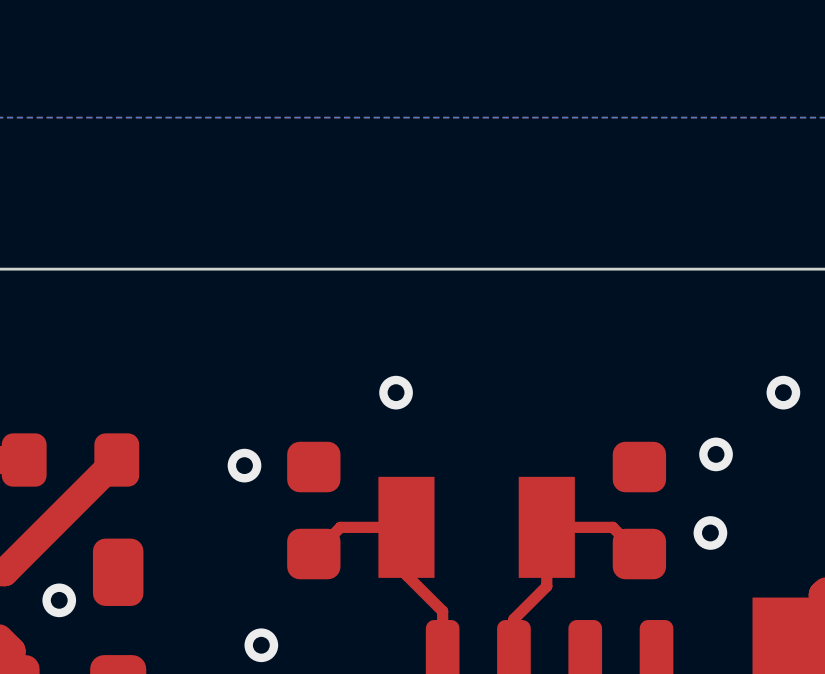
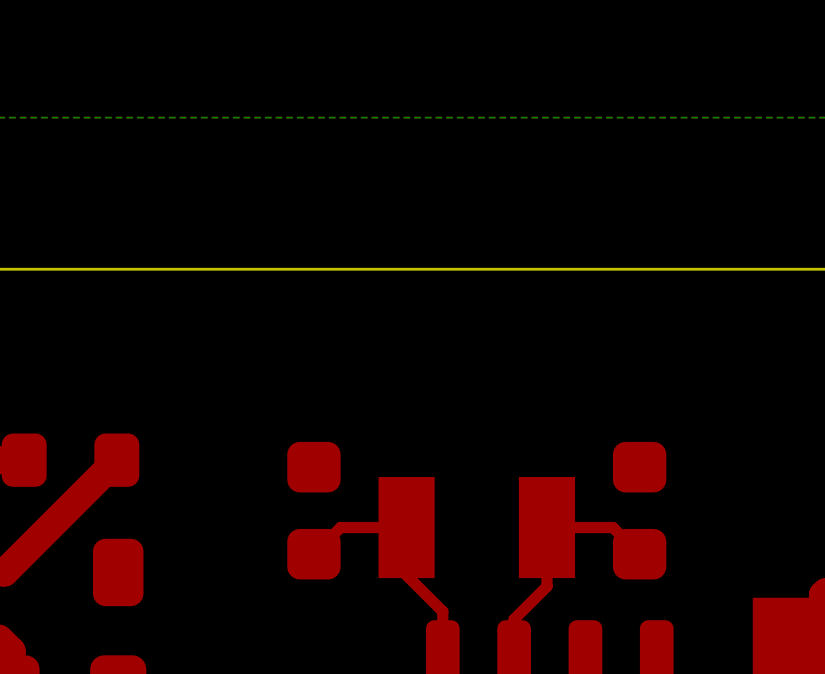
via: (396, 392) -> none
via: (783, 392) -> none
via: (716, 454) -> none
via: (244, 465) -> none
via: (710, 532) -> none
via: (59, 600) -> none
via: (261, 645) -> none

